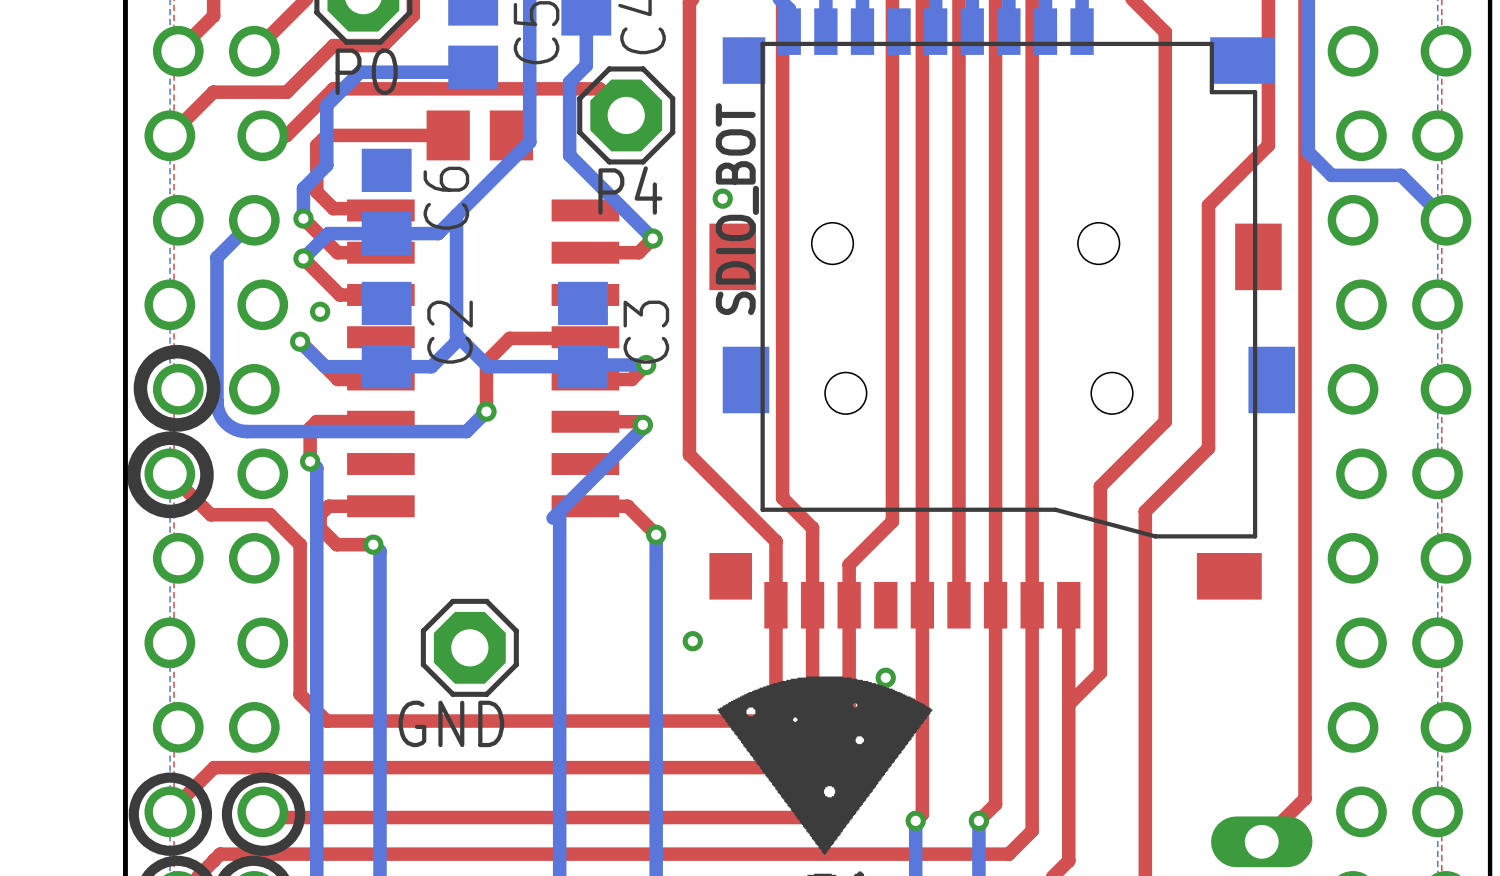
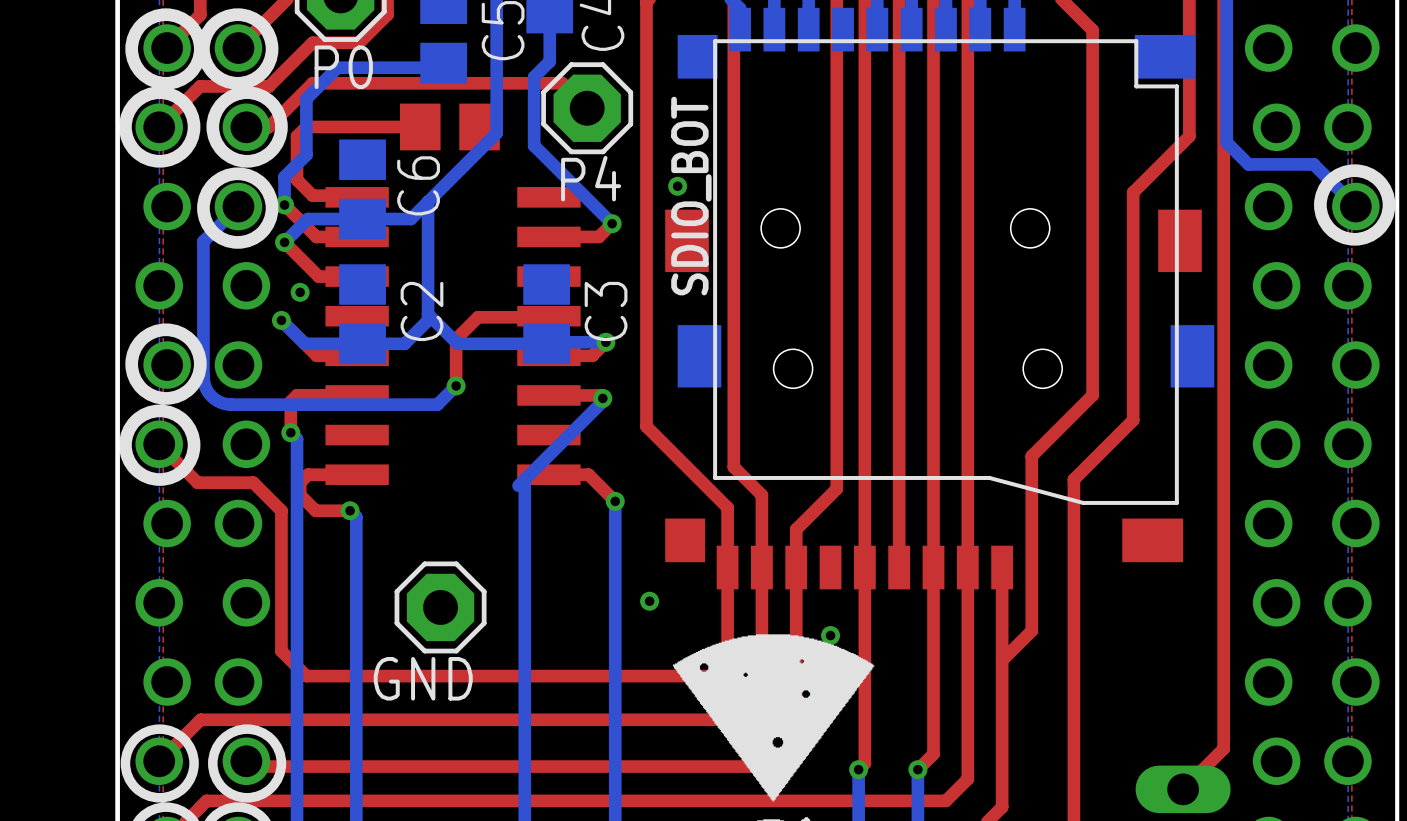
drawing: none -> [119, 8, 288, 249]
drawing: none -> [1314, 164, 1396, 246]

